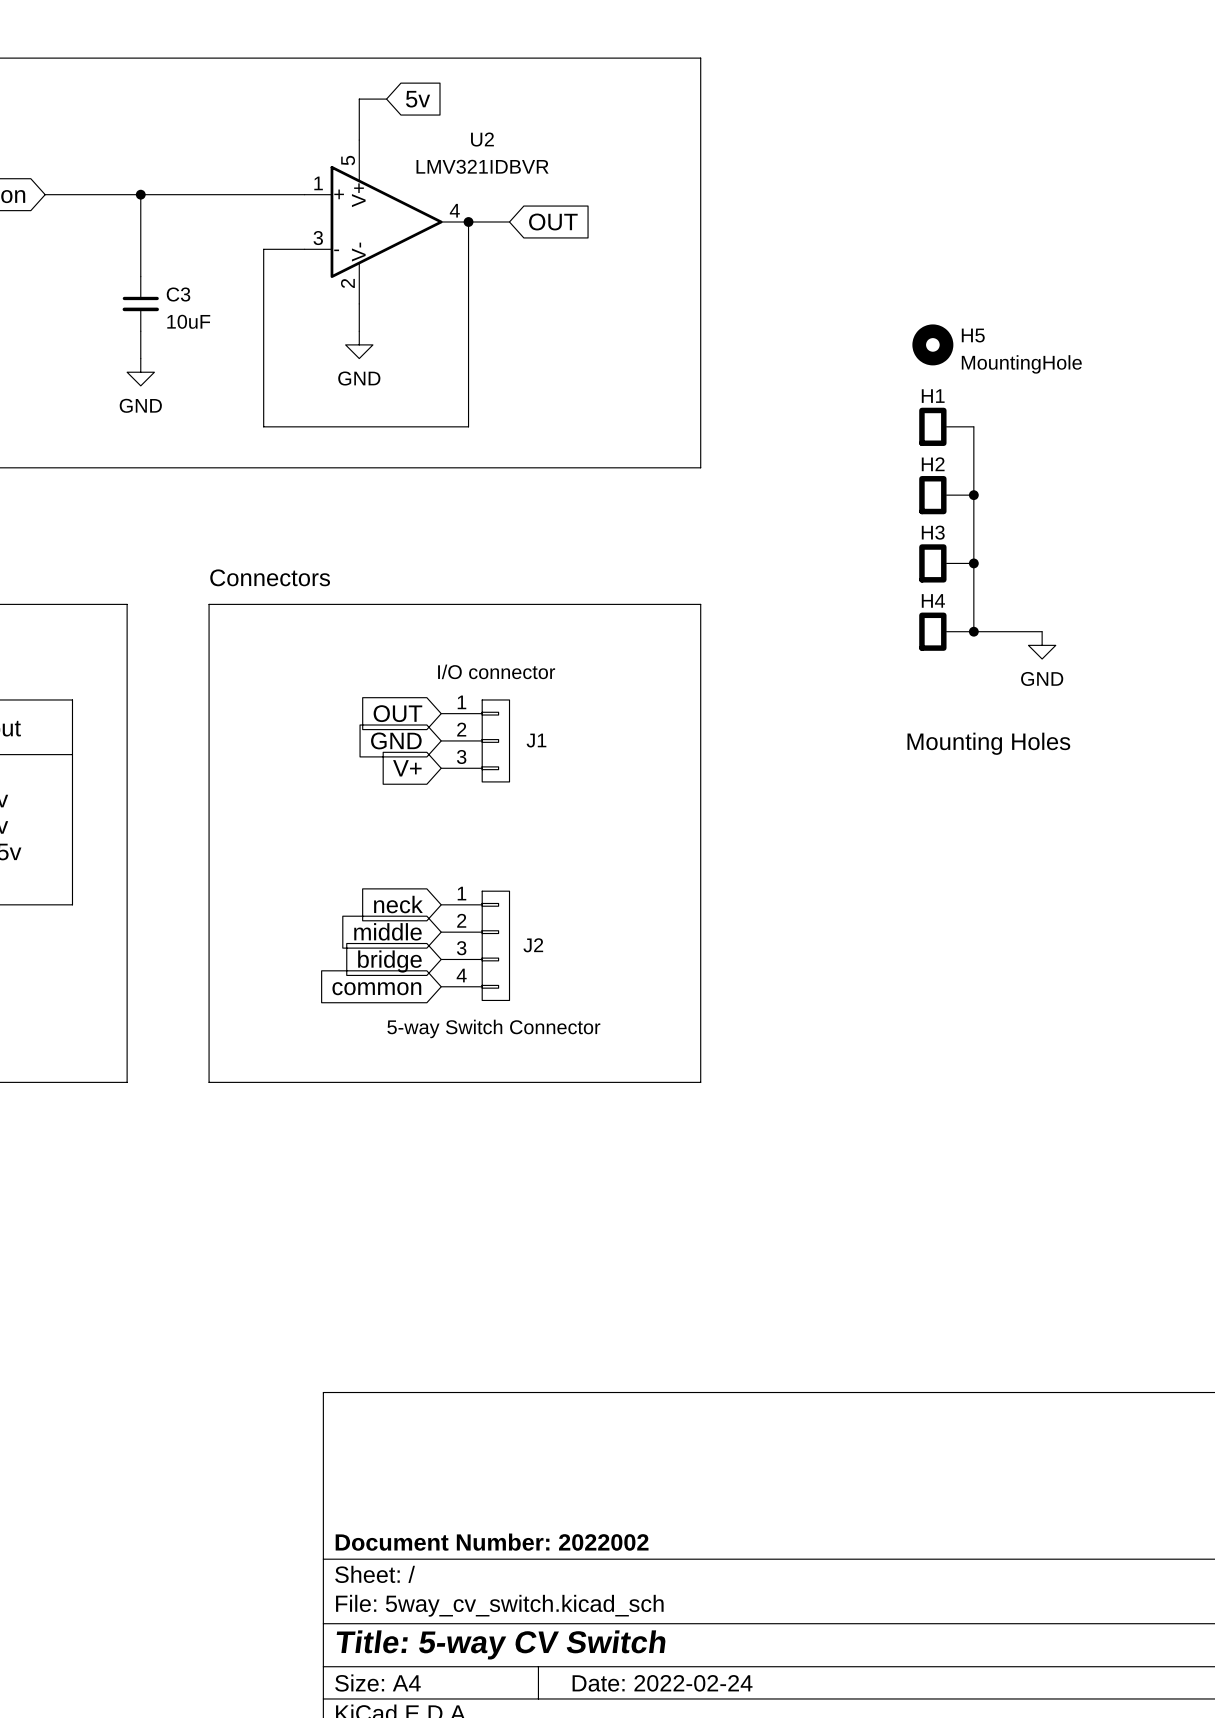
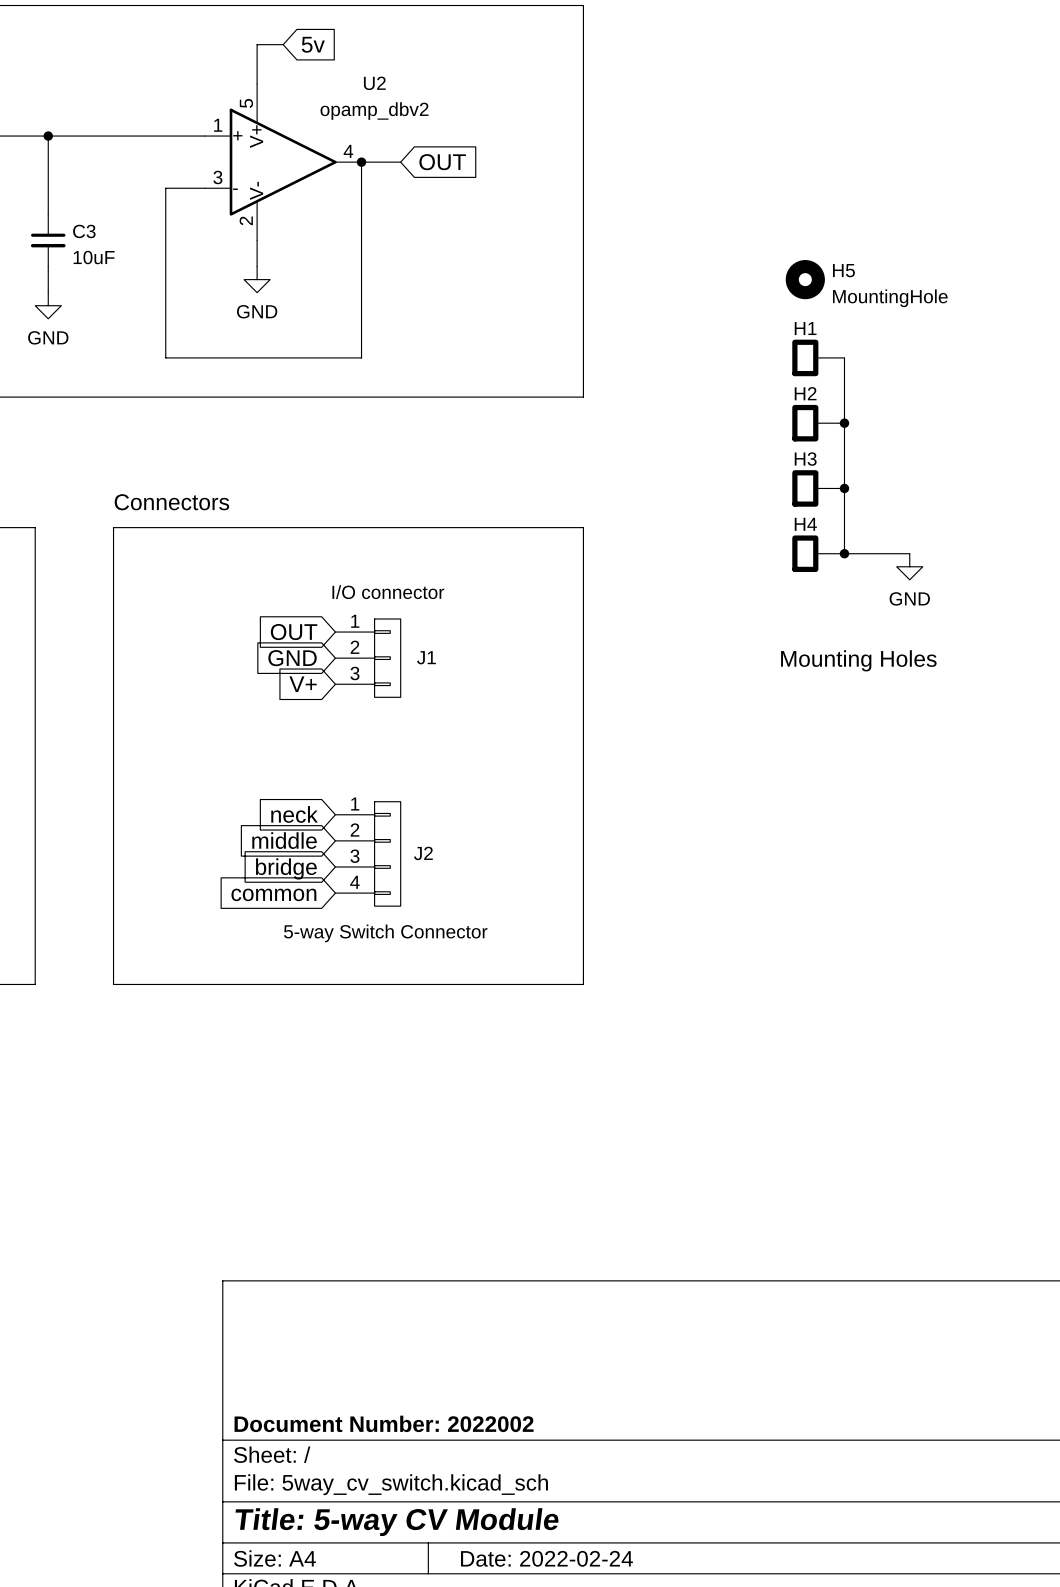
U2 value: LMV321IDBVR (482, 166) -> opamp_dbv2 (374, 111)
title block: Title: 5-way CV Switch (501, 1644) -> Title: 5-way CV Module (397, 1522)

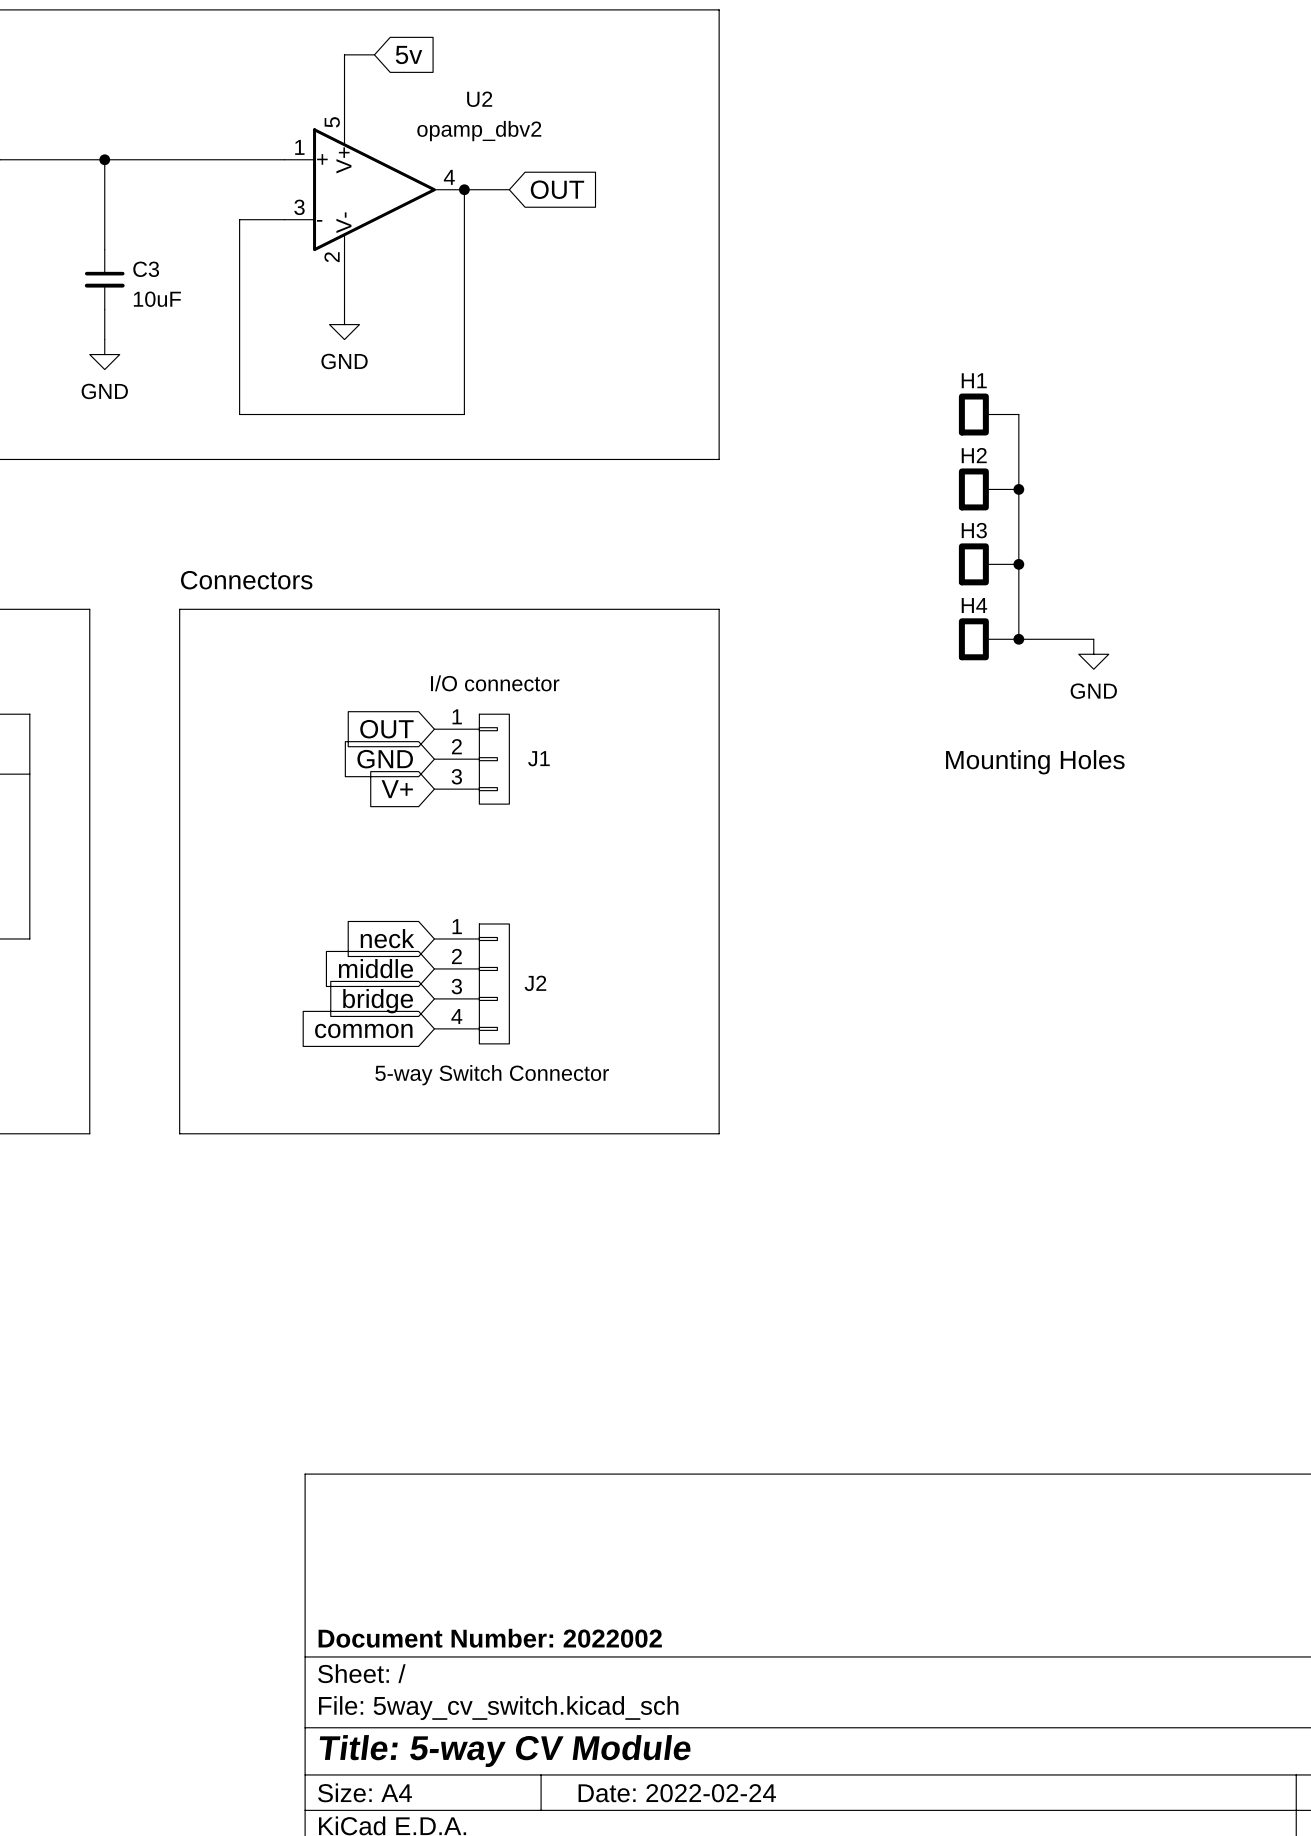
H5: MountingHole (805, 279) -> none

